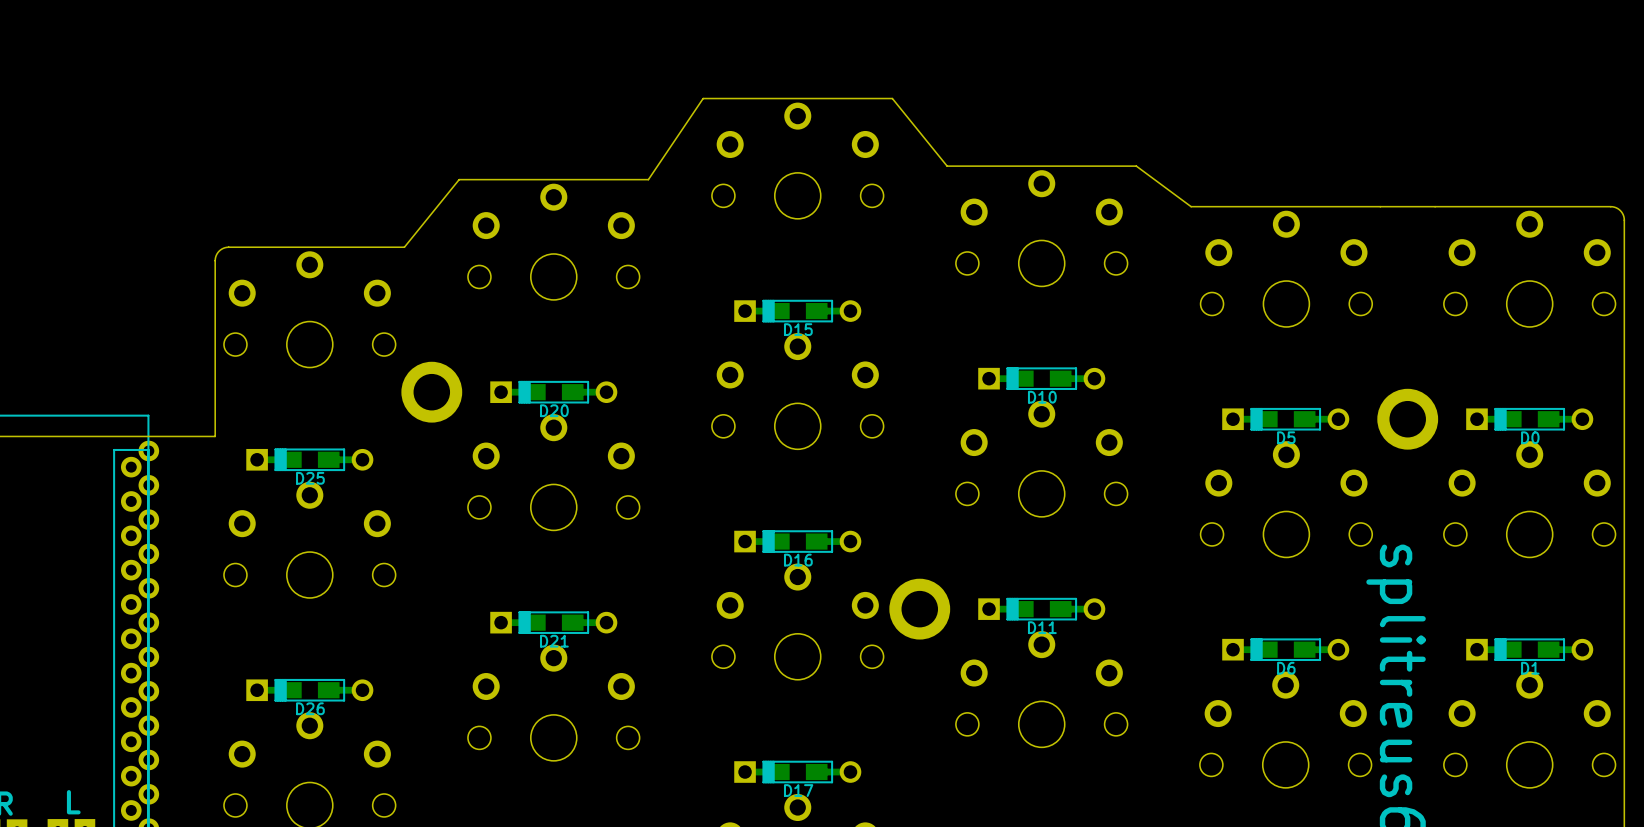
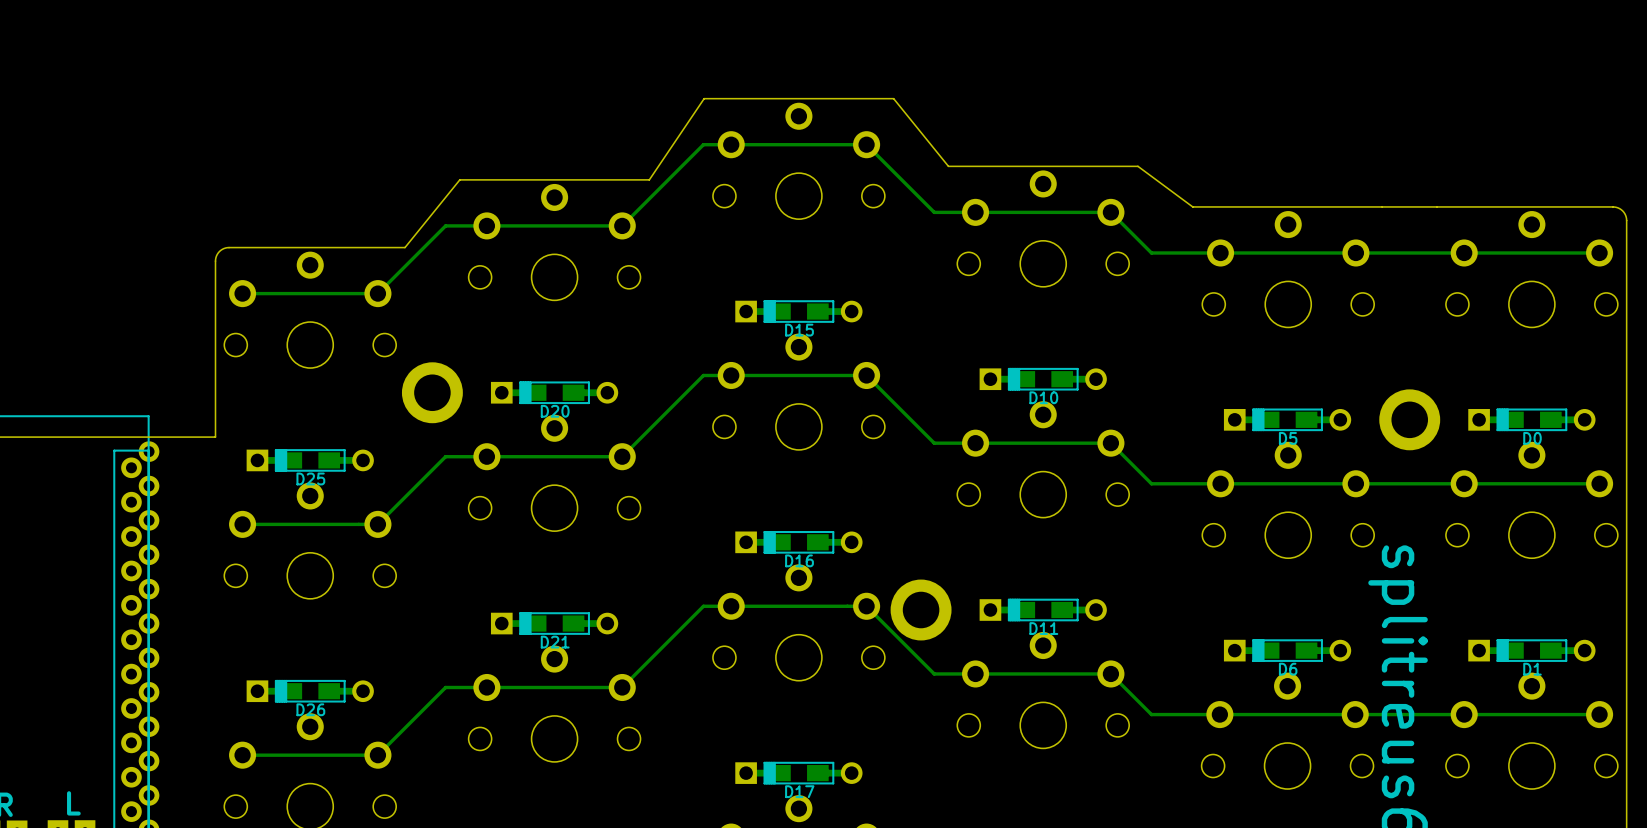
track: none -> (1599, 252) (1151, 252) (1110, 212) (934, 212) (866, 144) (703, 144) (622, 225) (445, 225) (377, 293) (242, 293)
track: none -> (1599, 483) (1151, 483) (1110, 443) (934, 443) (866, 375) (703, 375) (622, 456) (445, 456) (377, 524) (242, 524)
track: none -> (1599, 714) (1151, 714) (1110, 673) (934, 673) (866, 606) (703, 606) (622, 687) (445, 687) (377, 755) (242, 755)

